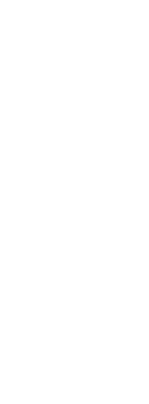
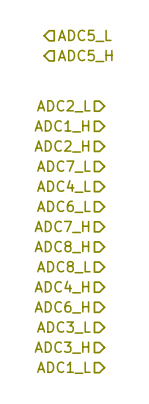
hierarchical label: none -> ADC5_L (84, 35)
hierarchical label: none -> ADC5_H (85, 55)
hierarchical label: none -> ADC2_L (63, 106)
hierarchical label: none -> ADC1_H (61, 126)
hierarchical label: none -> ADC2_H (61, 146)
hierarchical label: none -> ADC7_L (63, 166)
hierarchical label: none -> ADC4_L (63, 186)
hierarchical label: none -> ADC6_L (63, 206)
hierarchical label: none -> ADC7_H (61, 226)
hierarchical label: none -> ADC8_H (61, 247)
hierarchical label: none -> ADC8_L (63, 267)
hierarchical label: none -> ADC4_H (61, 287)
hierarchical label: none -> ADC6_H (61, 307)
hierarchical label: none -> ADC3_L (63, 327)
hierarchical label: none -> ADC3_H (61, 347)
hierarchical label: none -> ADC1_L (63, 367)

